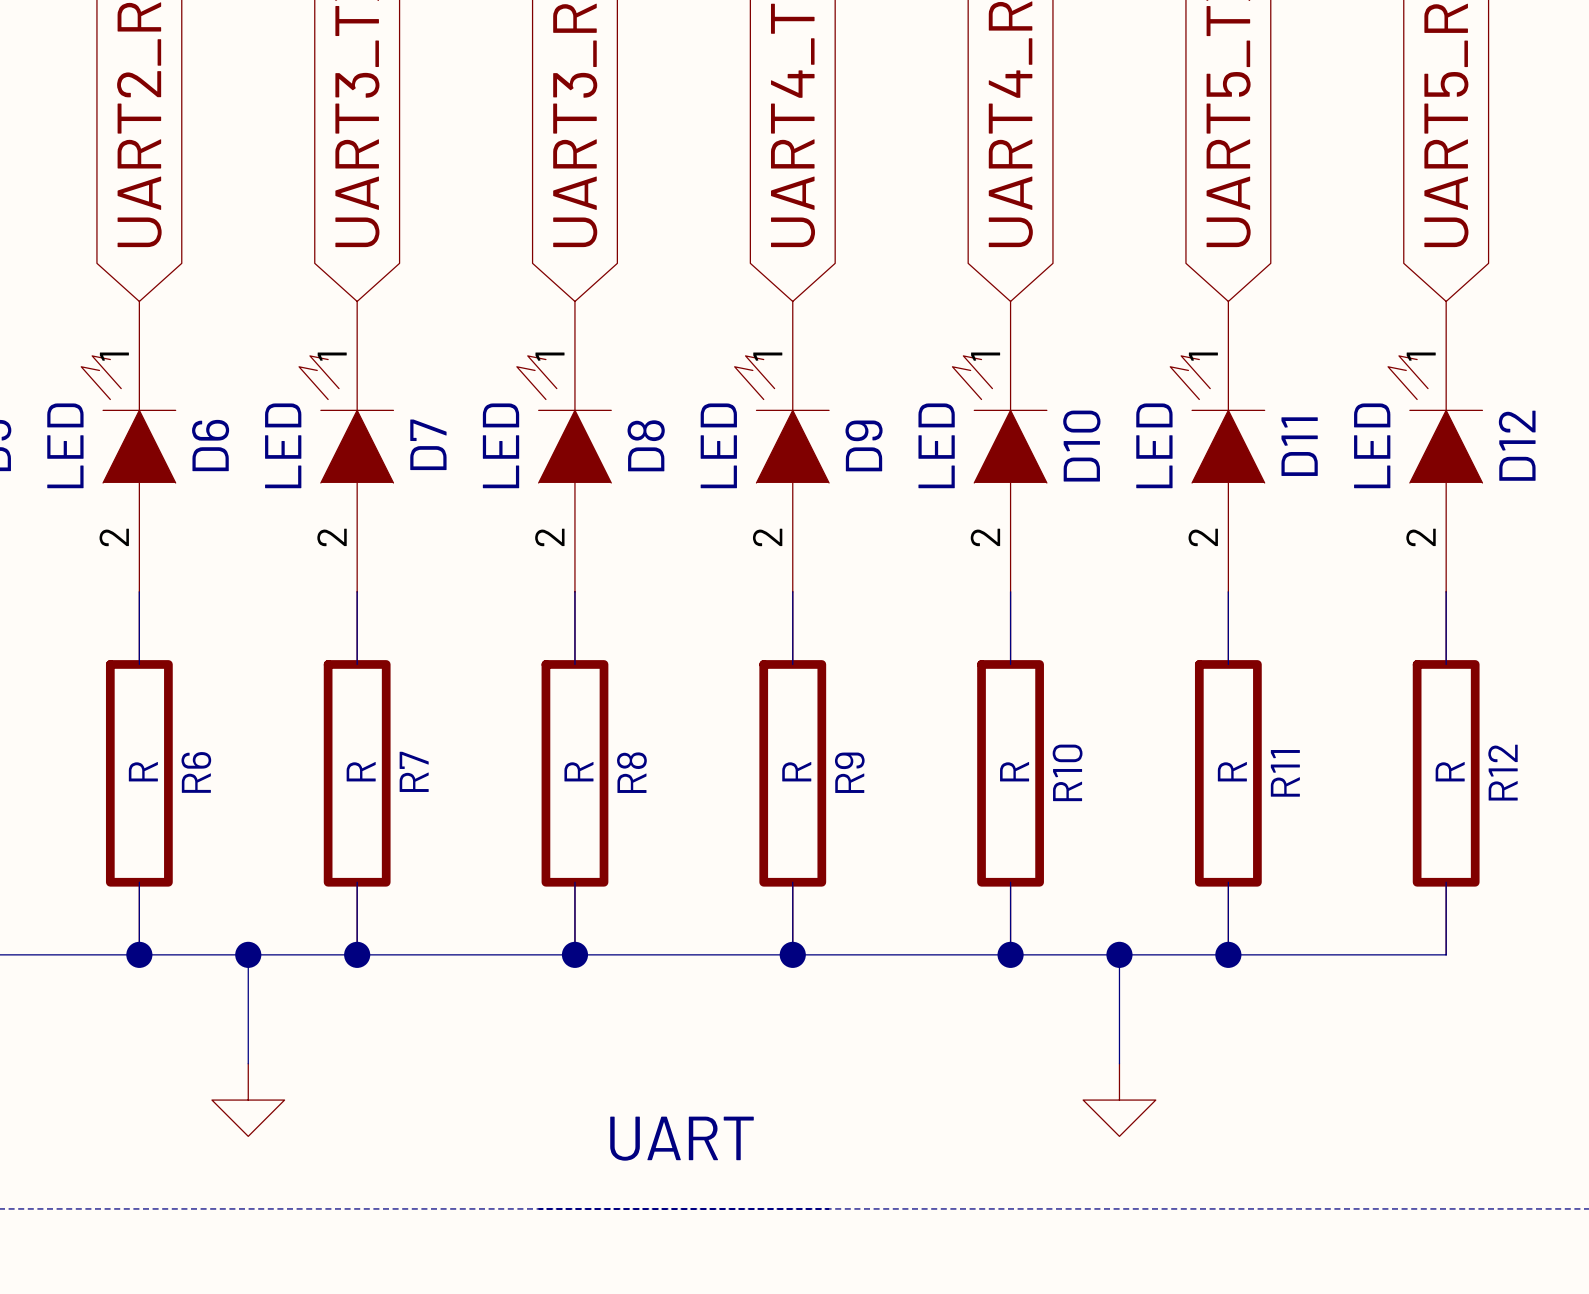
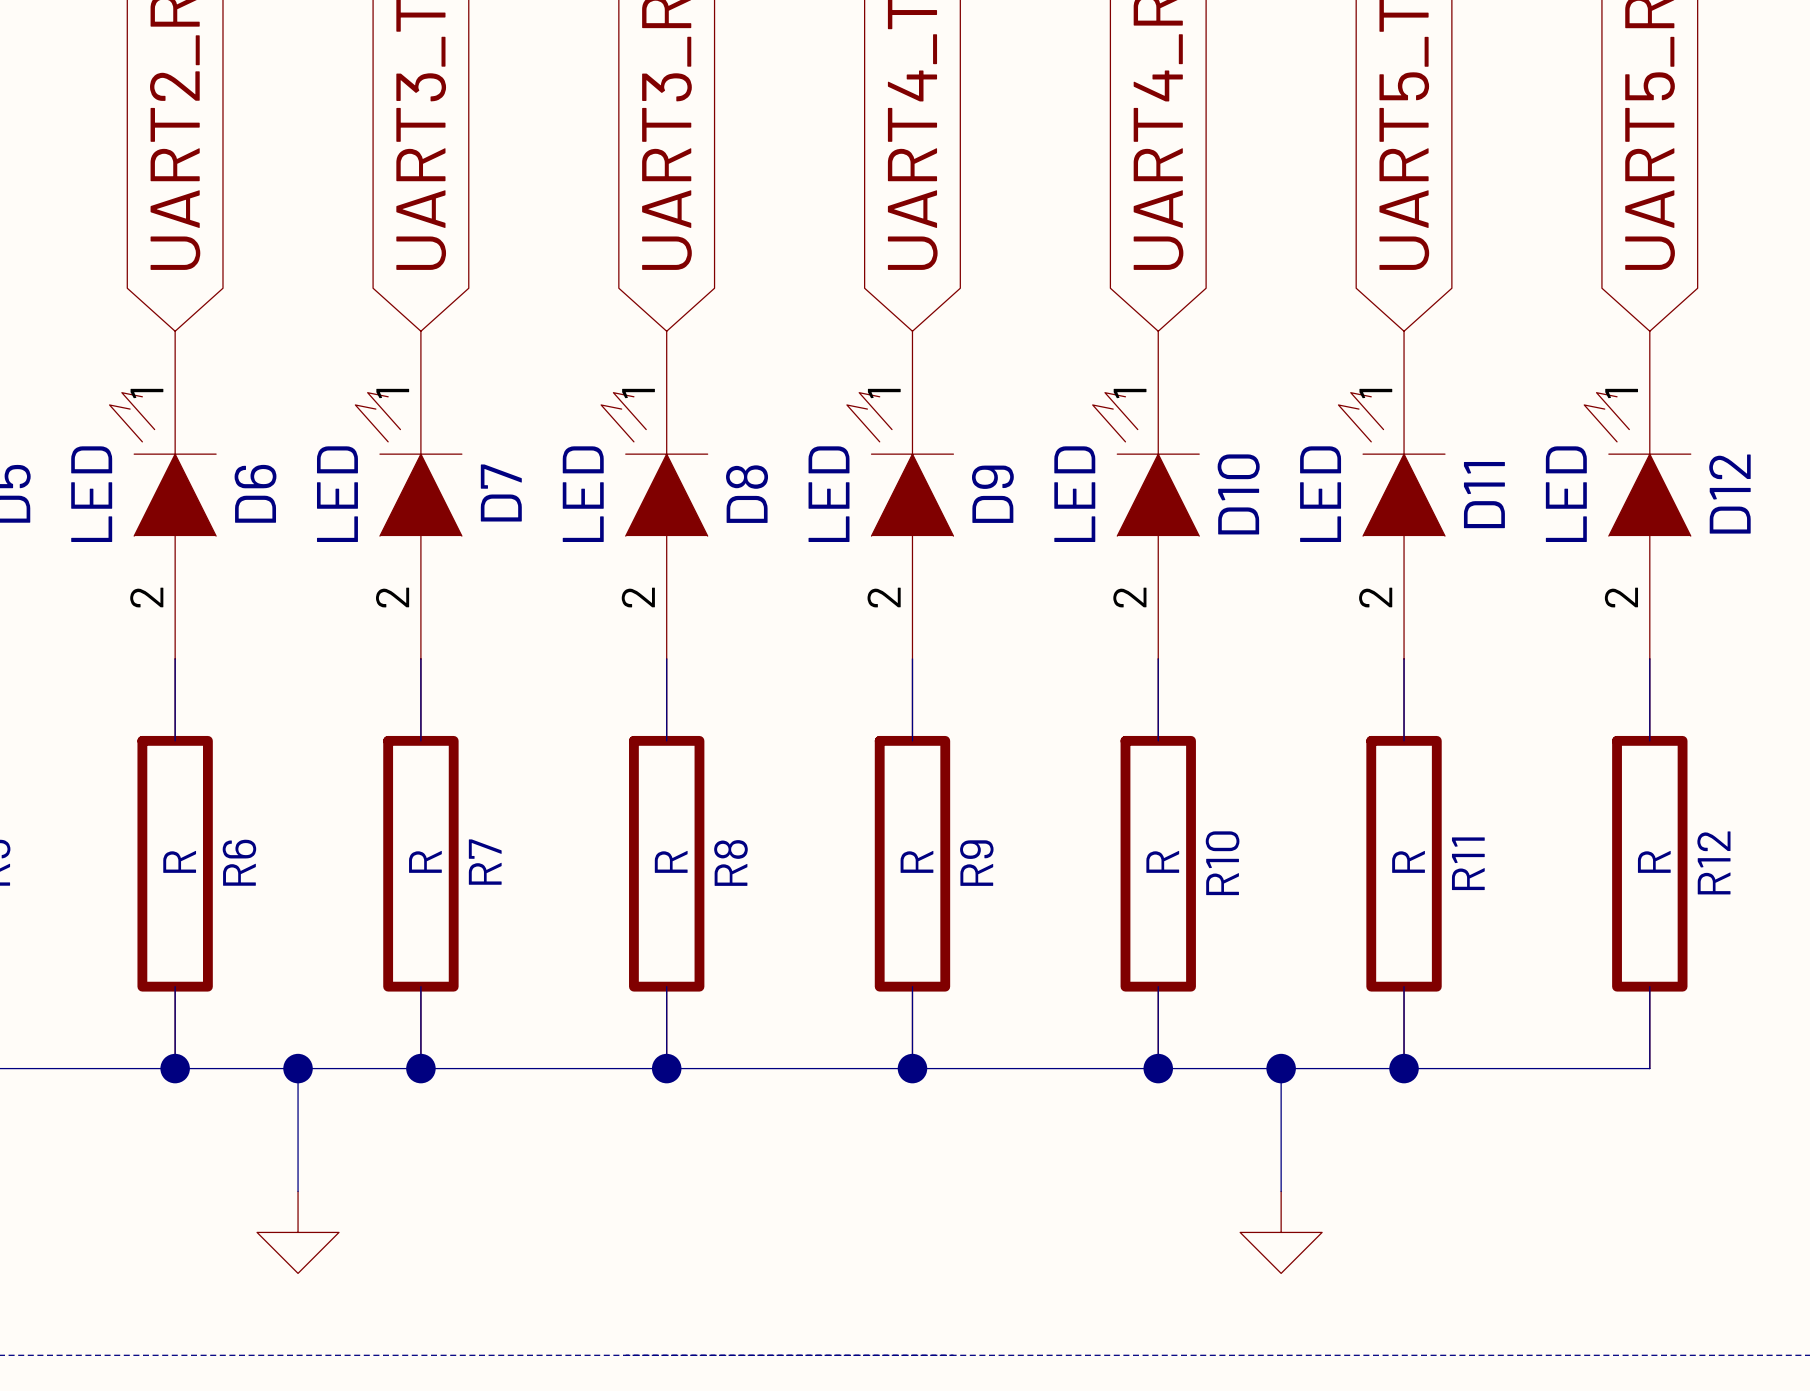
text: UART (682, 1138) -> none

